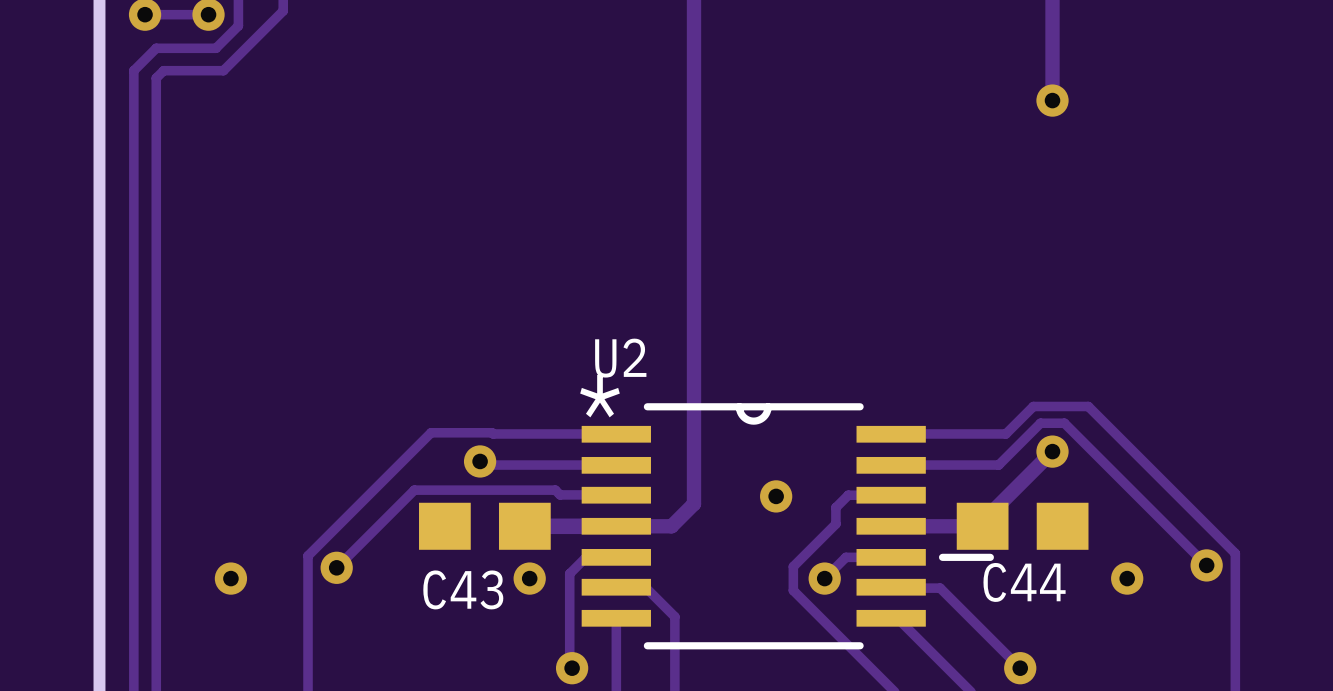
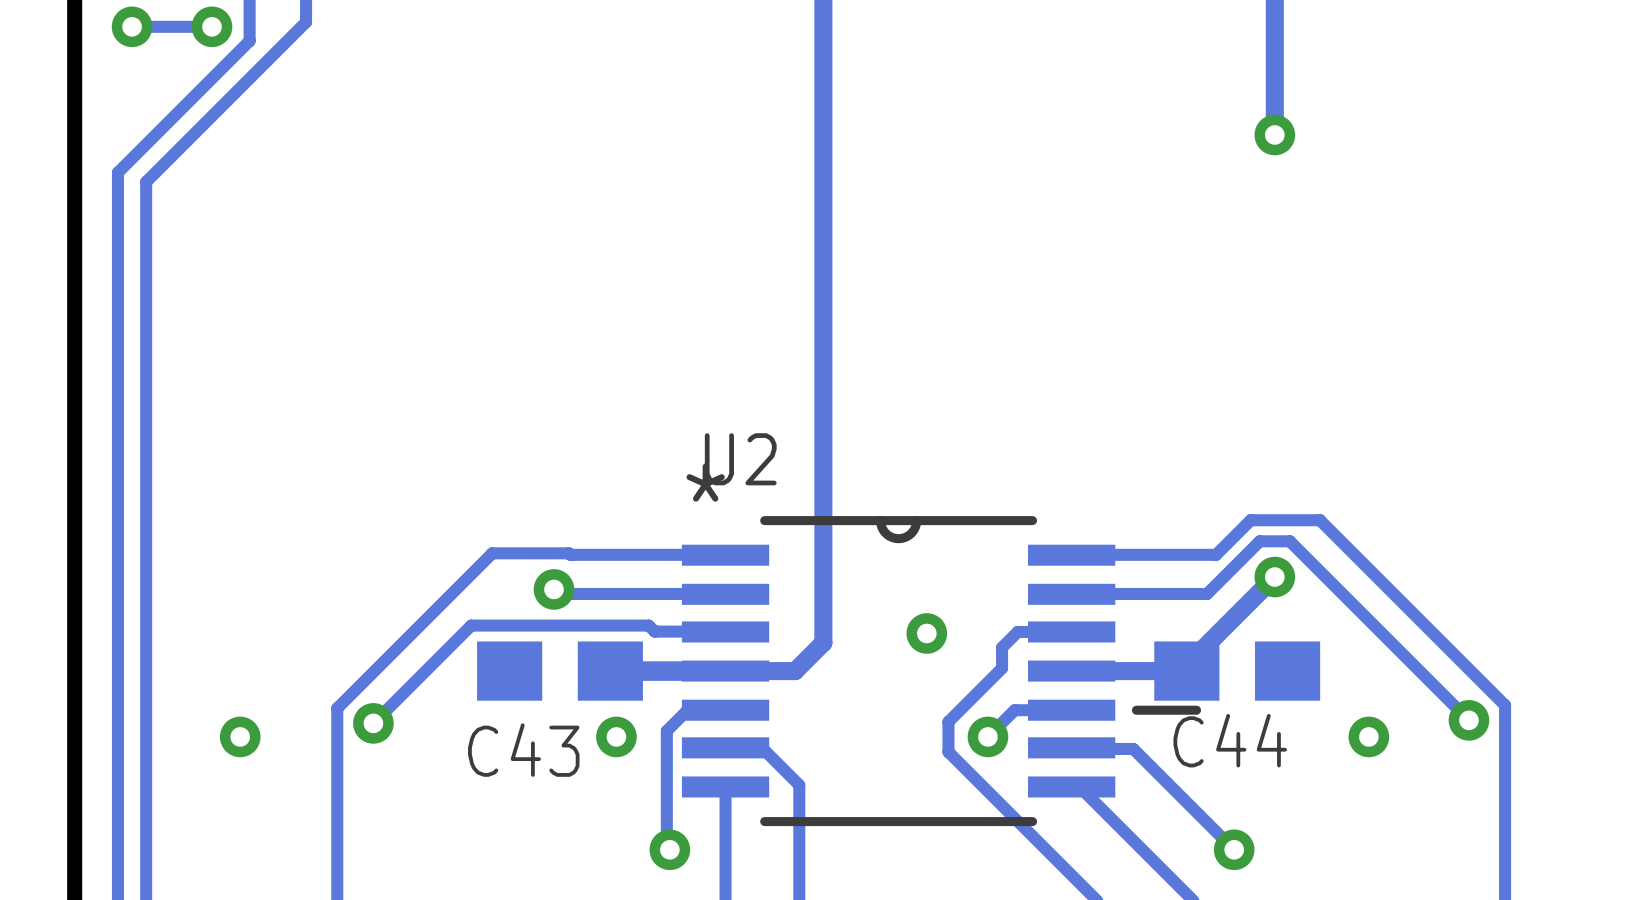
track: (216, 48) (156, 48) (133, 70) (133, 130) -> (221, 69) (117, 172)
track: (223, 70) (163, 70) (156, 78) (156, 137) -> (230, 97) (146, 182)

